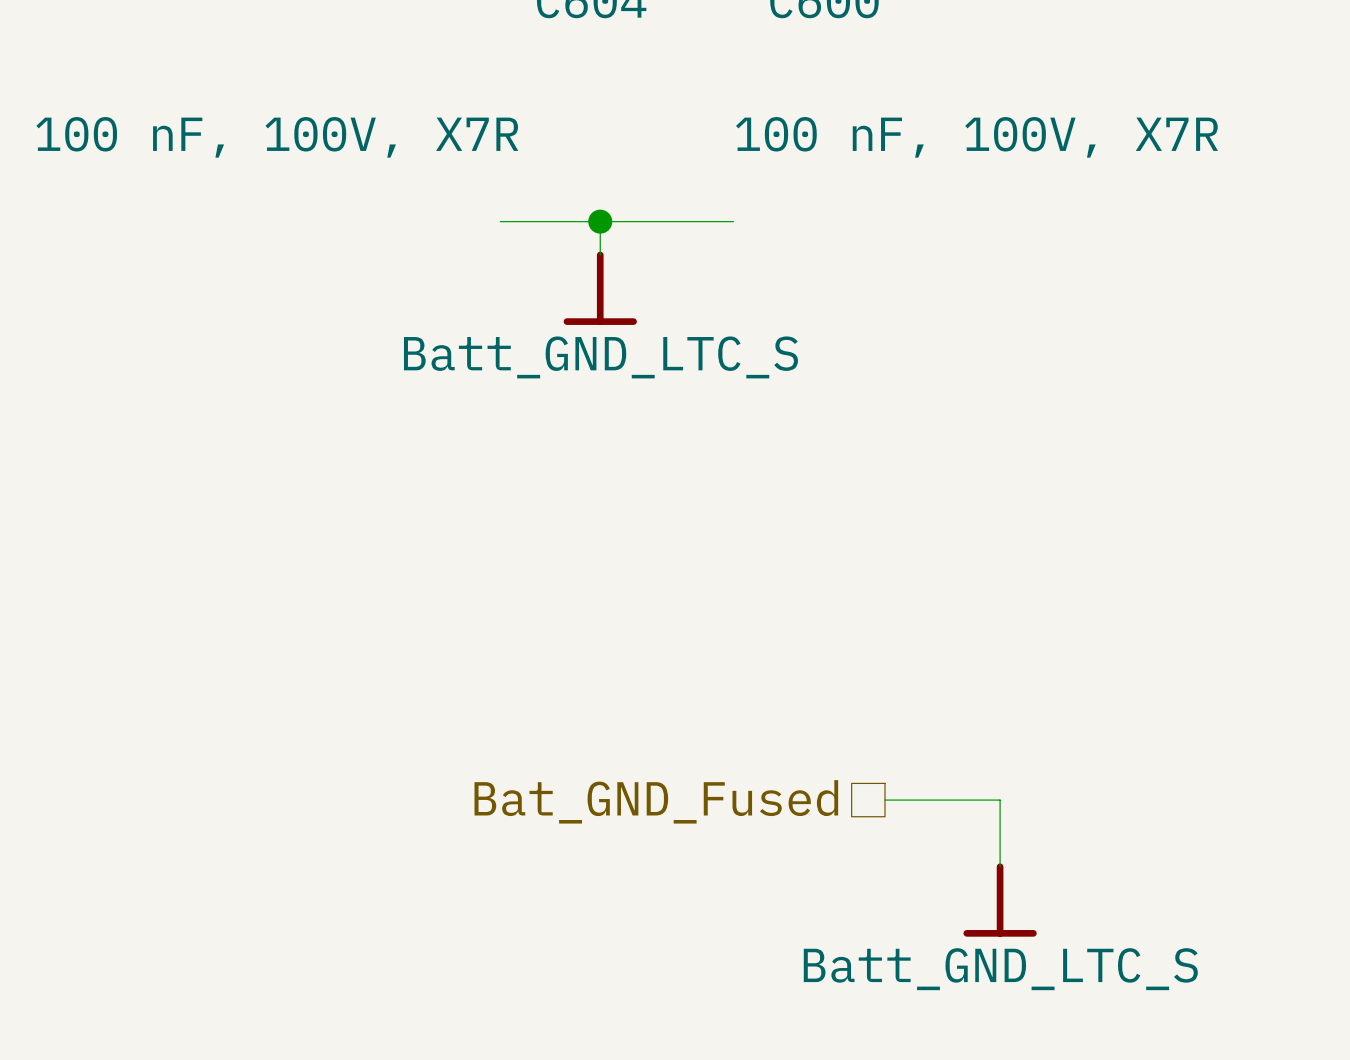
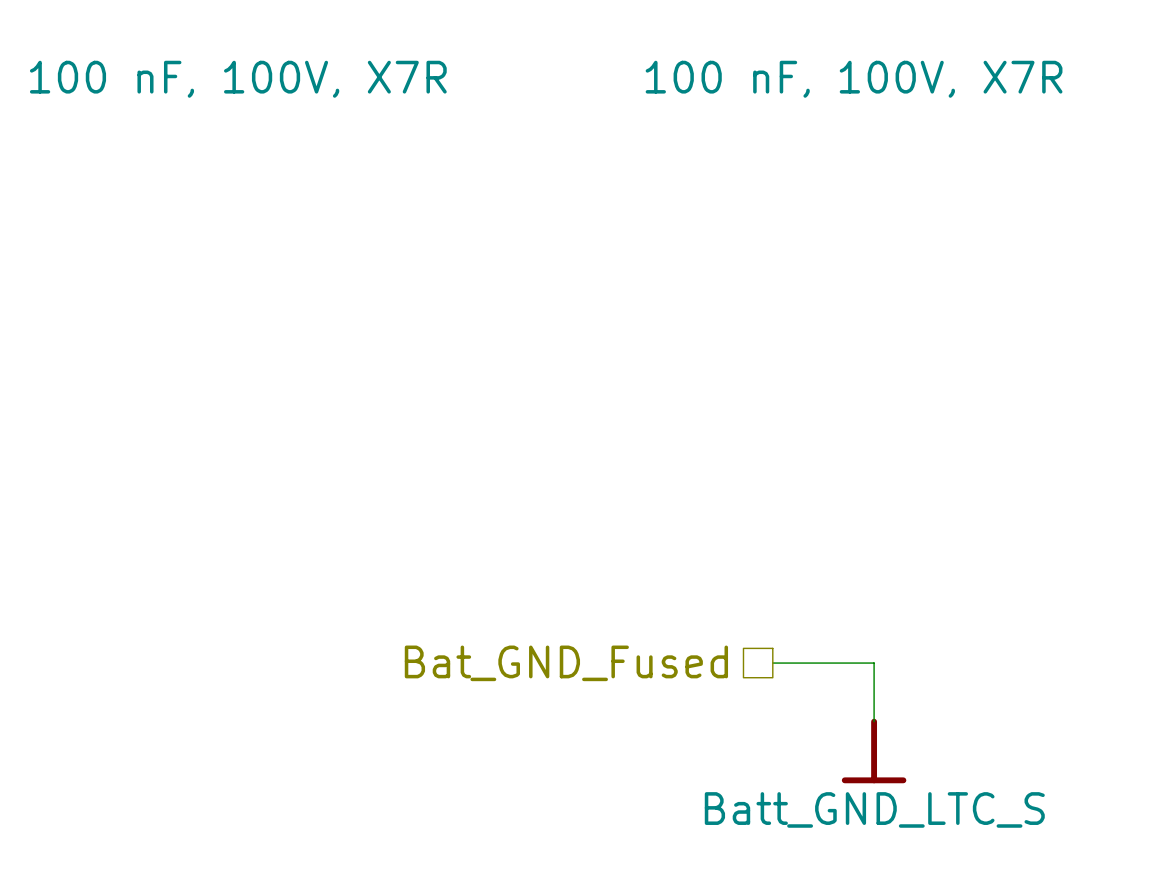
wire: (500, 221) (733, 221) -> none
wire: (600, 221) (600, 254) -> none
junction: (600, 221) -> none
power symbol: Batt_GND_LTC_S (600, 288) -> none

